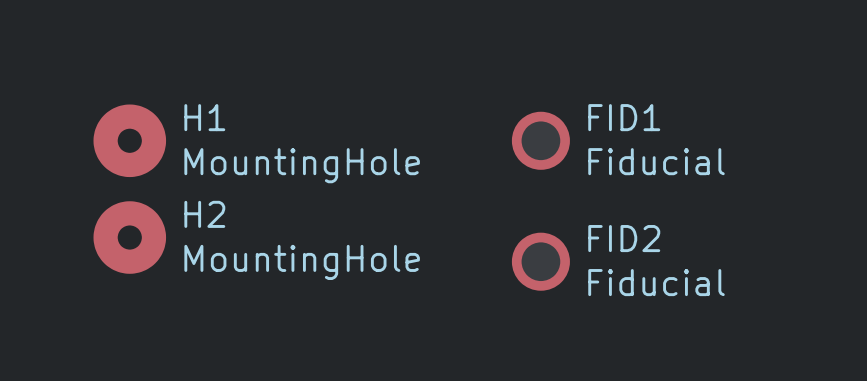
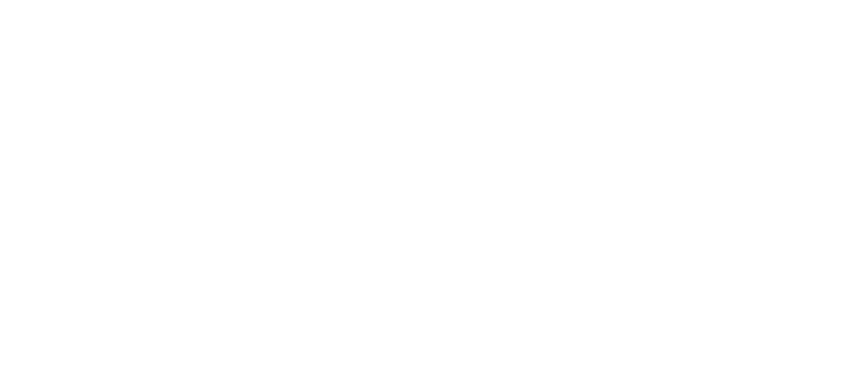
H1: MountingHole (129, 140) -> none
FID1: Fiducial (540, 140) -> none
H2: MountingHole (129, 237) -> none
FID2: Fiducial (540, 261) -> none

